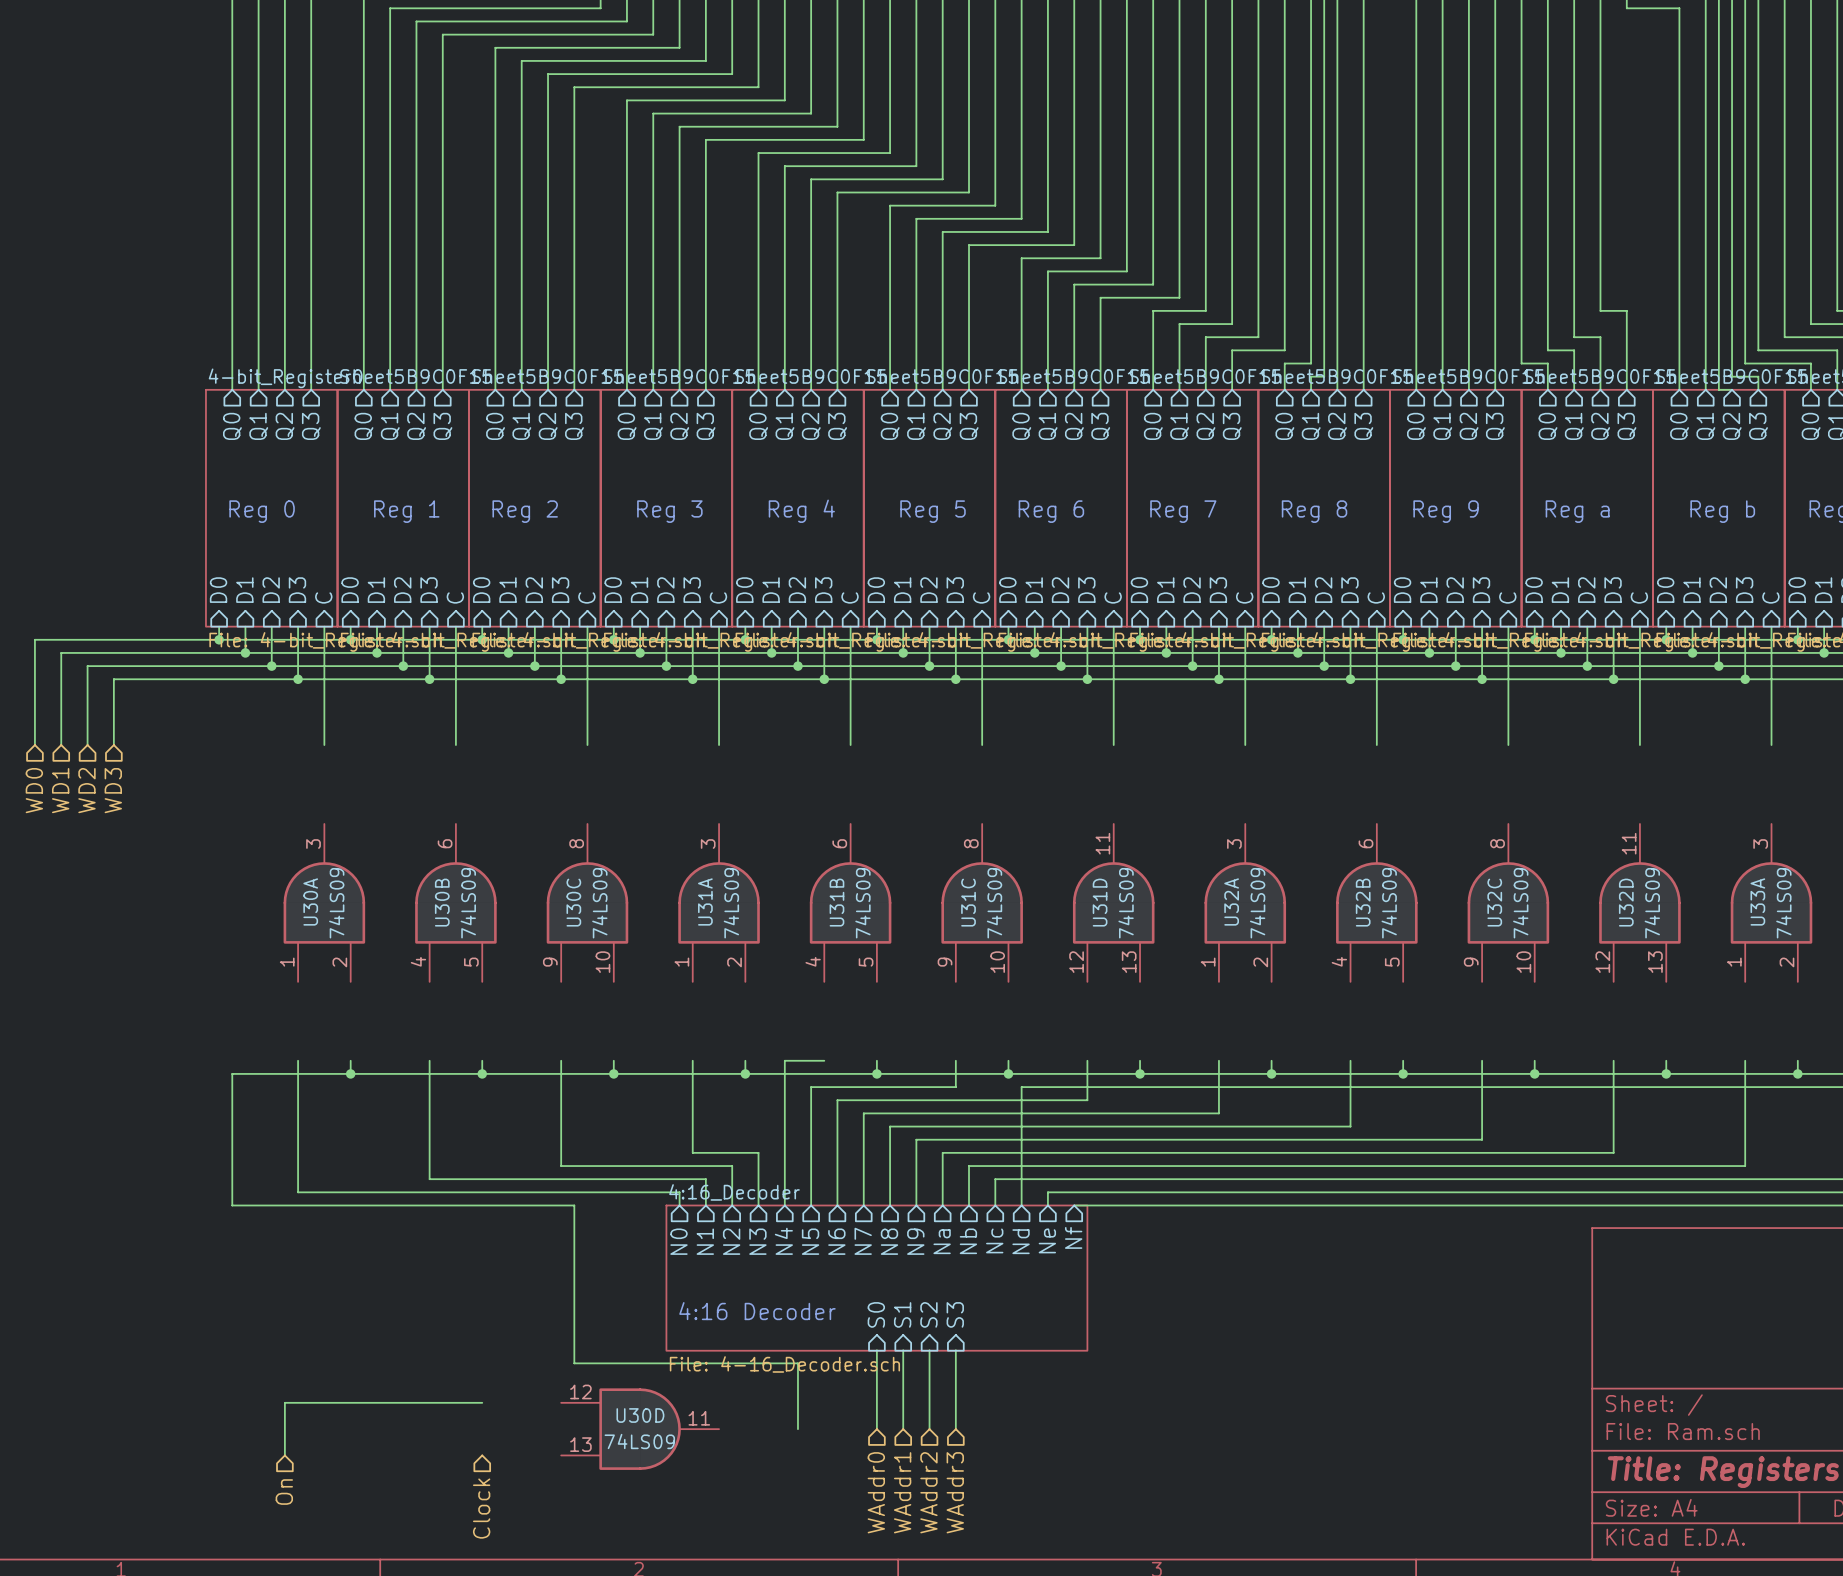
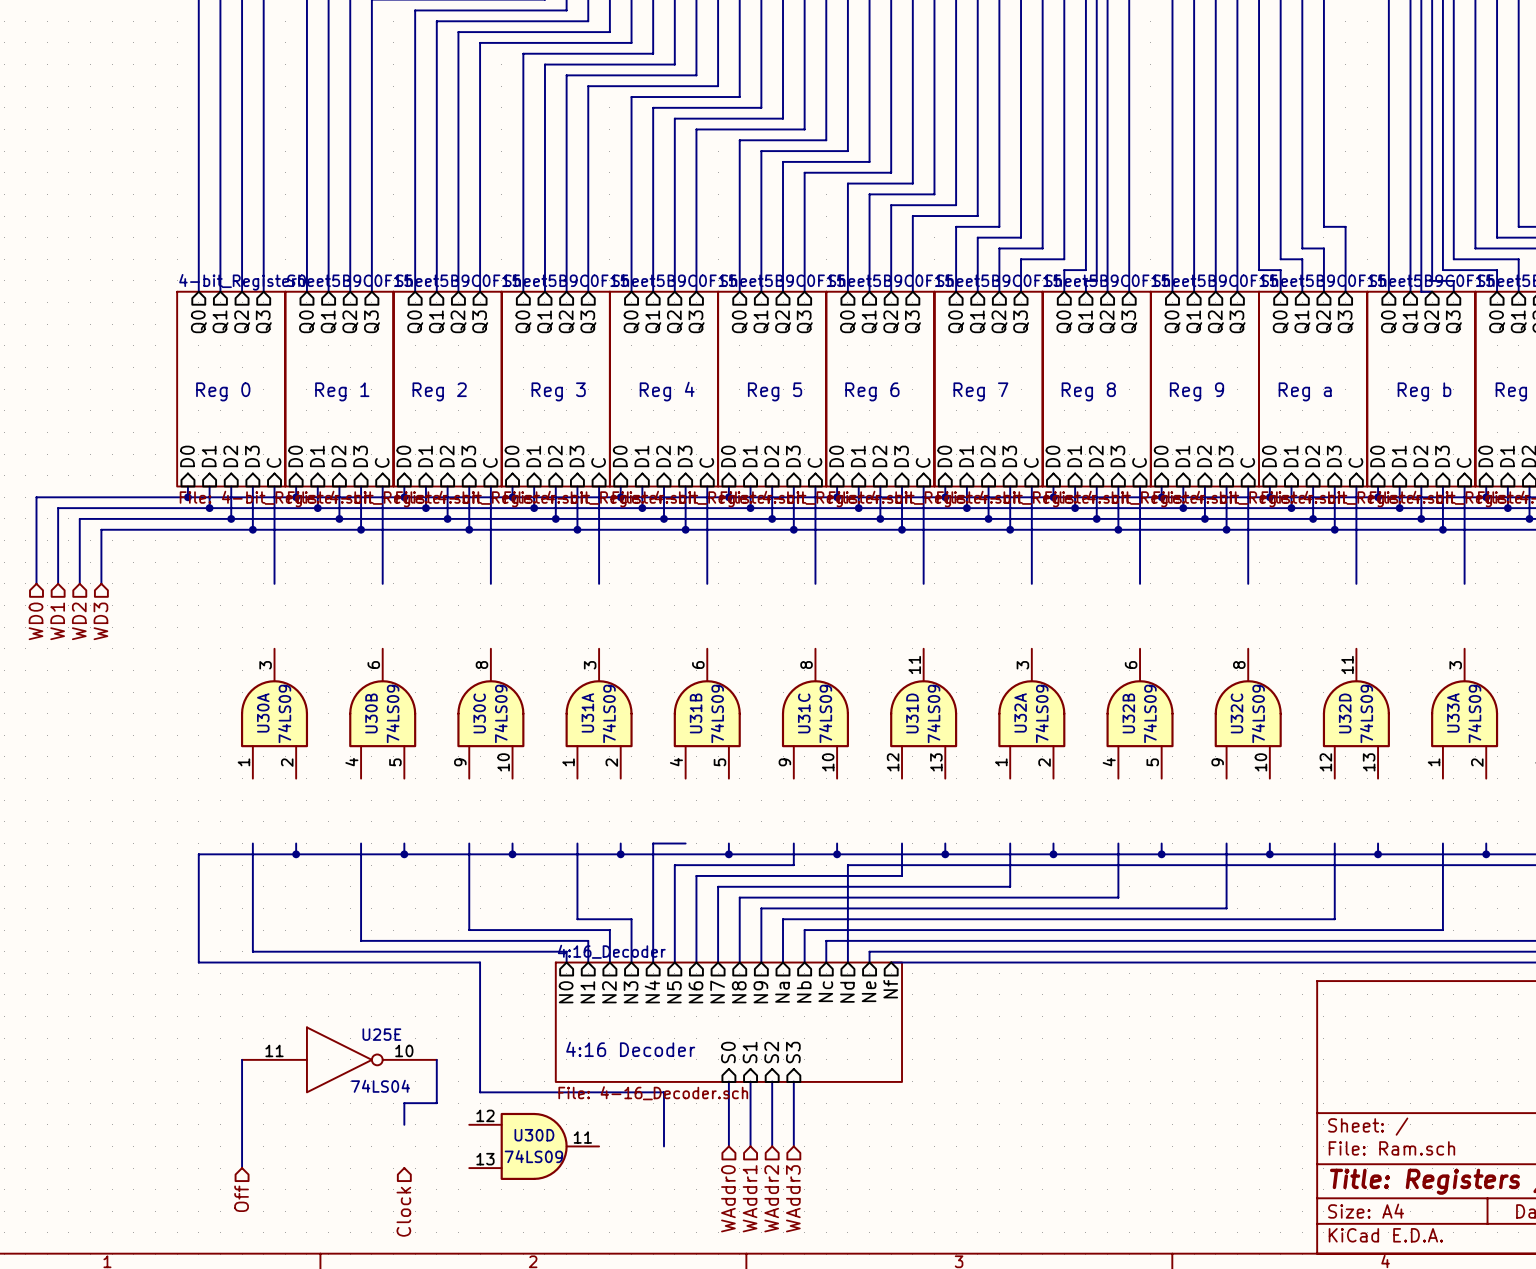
U25E: none -> 74LS04 (339, 1059)
wire: none -> (436, 1059) (436, 1103) (404, 1103) (404, 1124)
wire: (284, 1402) (482, 1402) -> (242, 1124) (242, 1059)
hierarchical label: On (284, 1492) -> Off (241, 1198)

